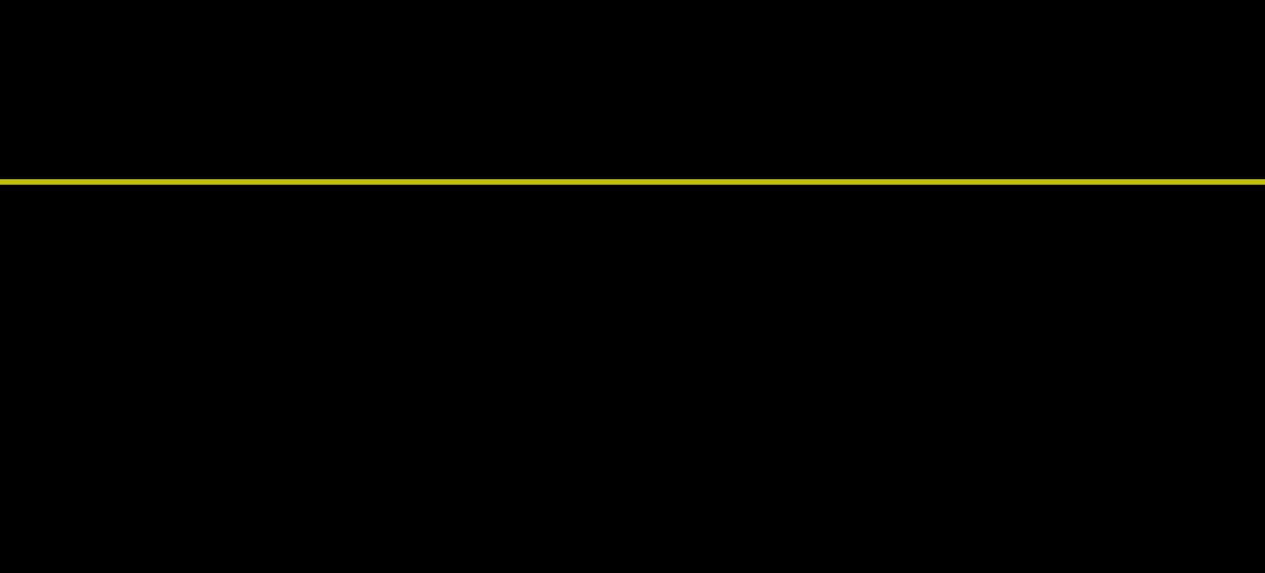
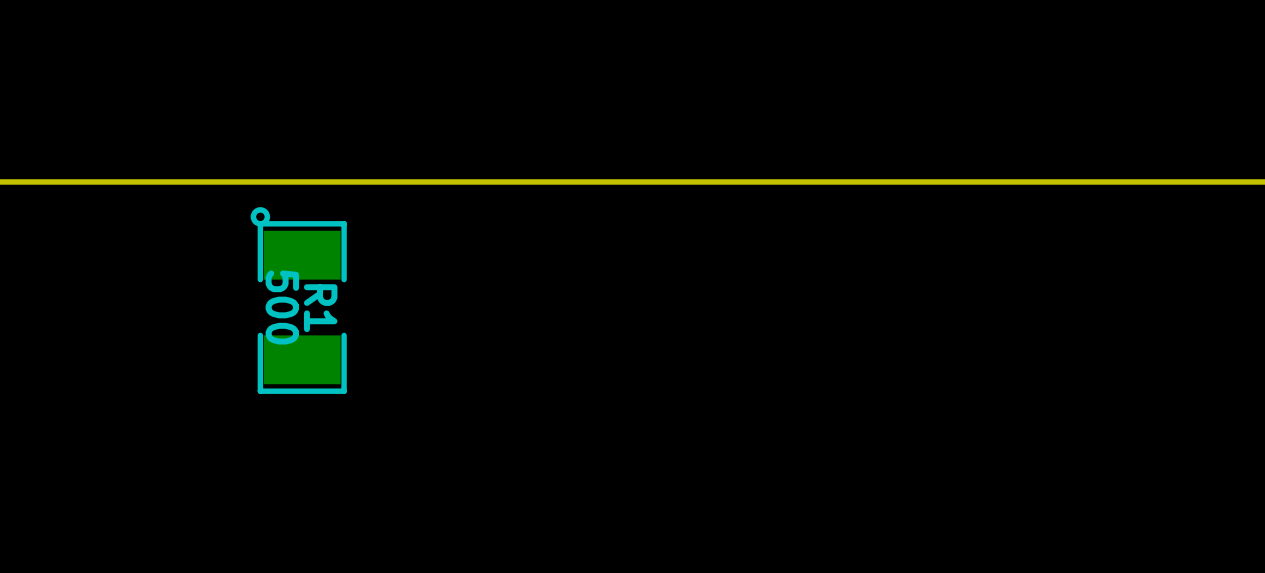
R1: none -> 500 (298, 300)

